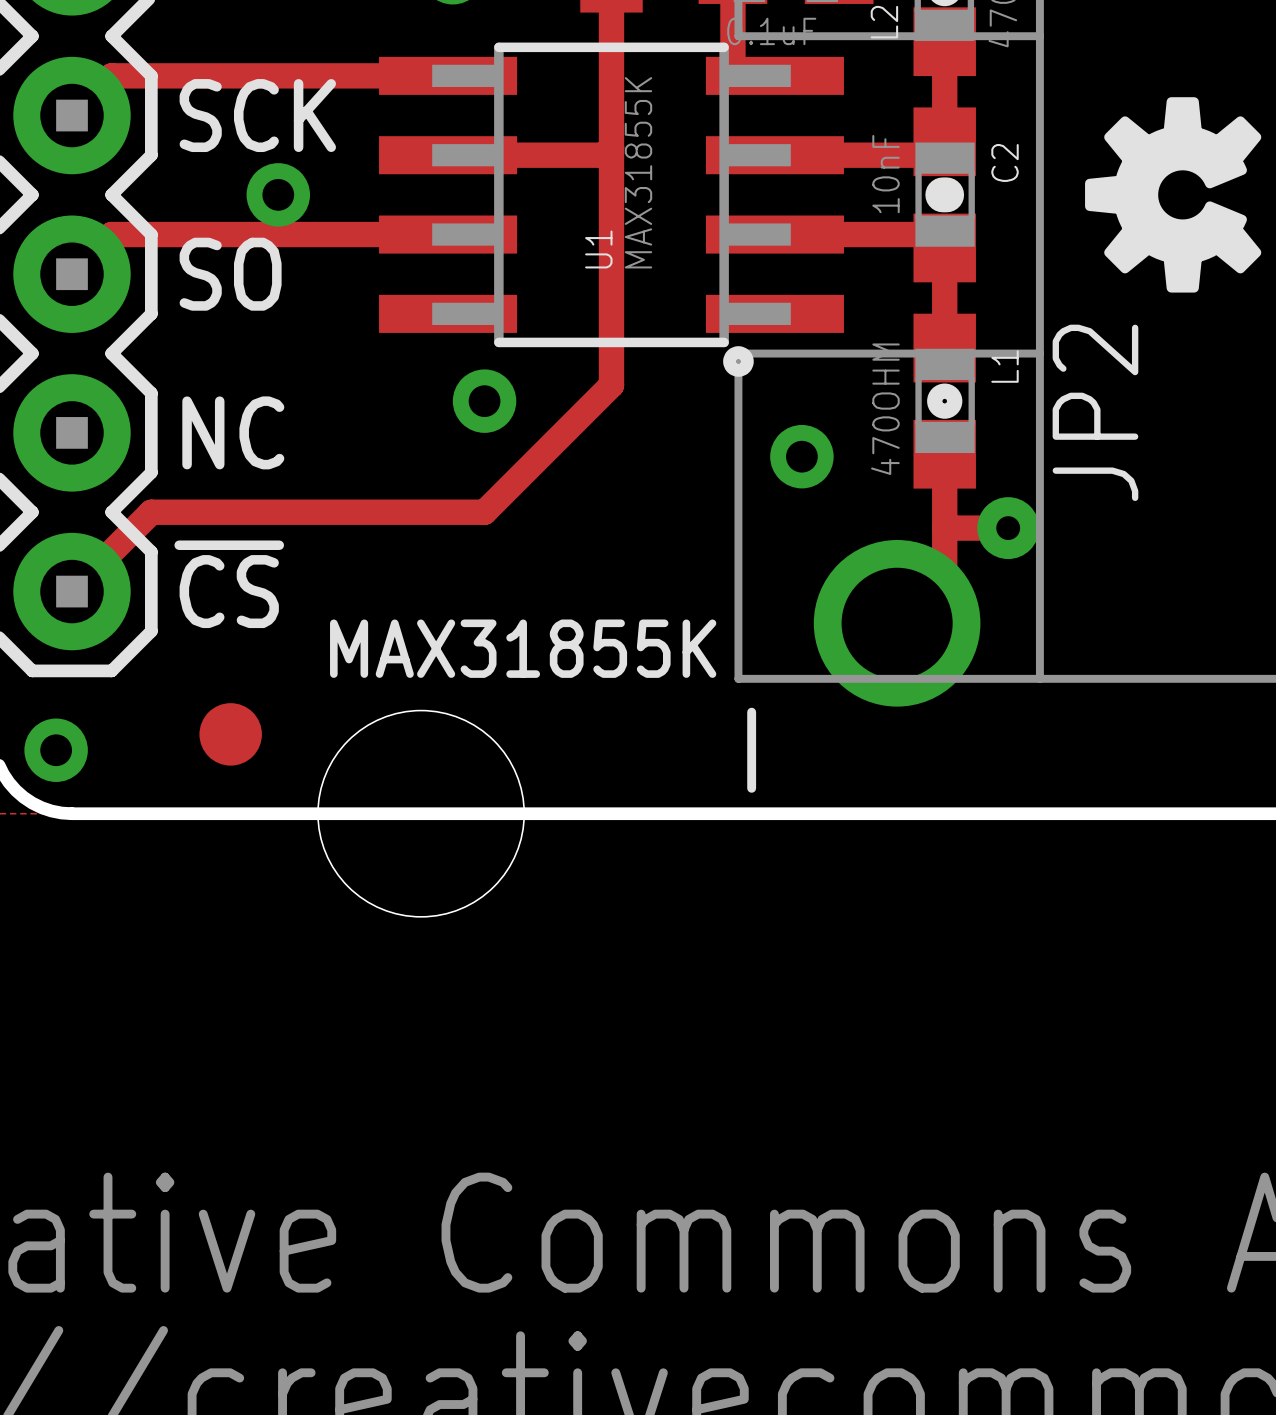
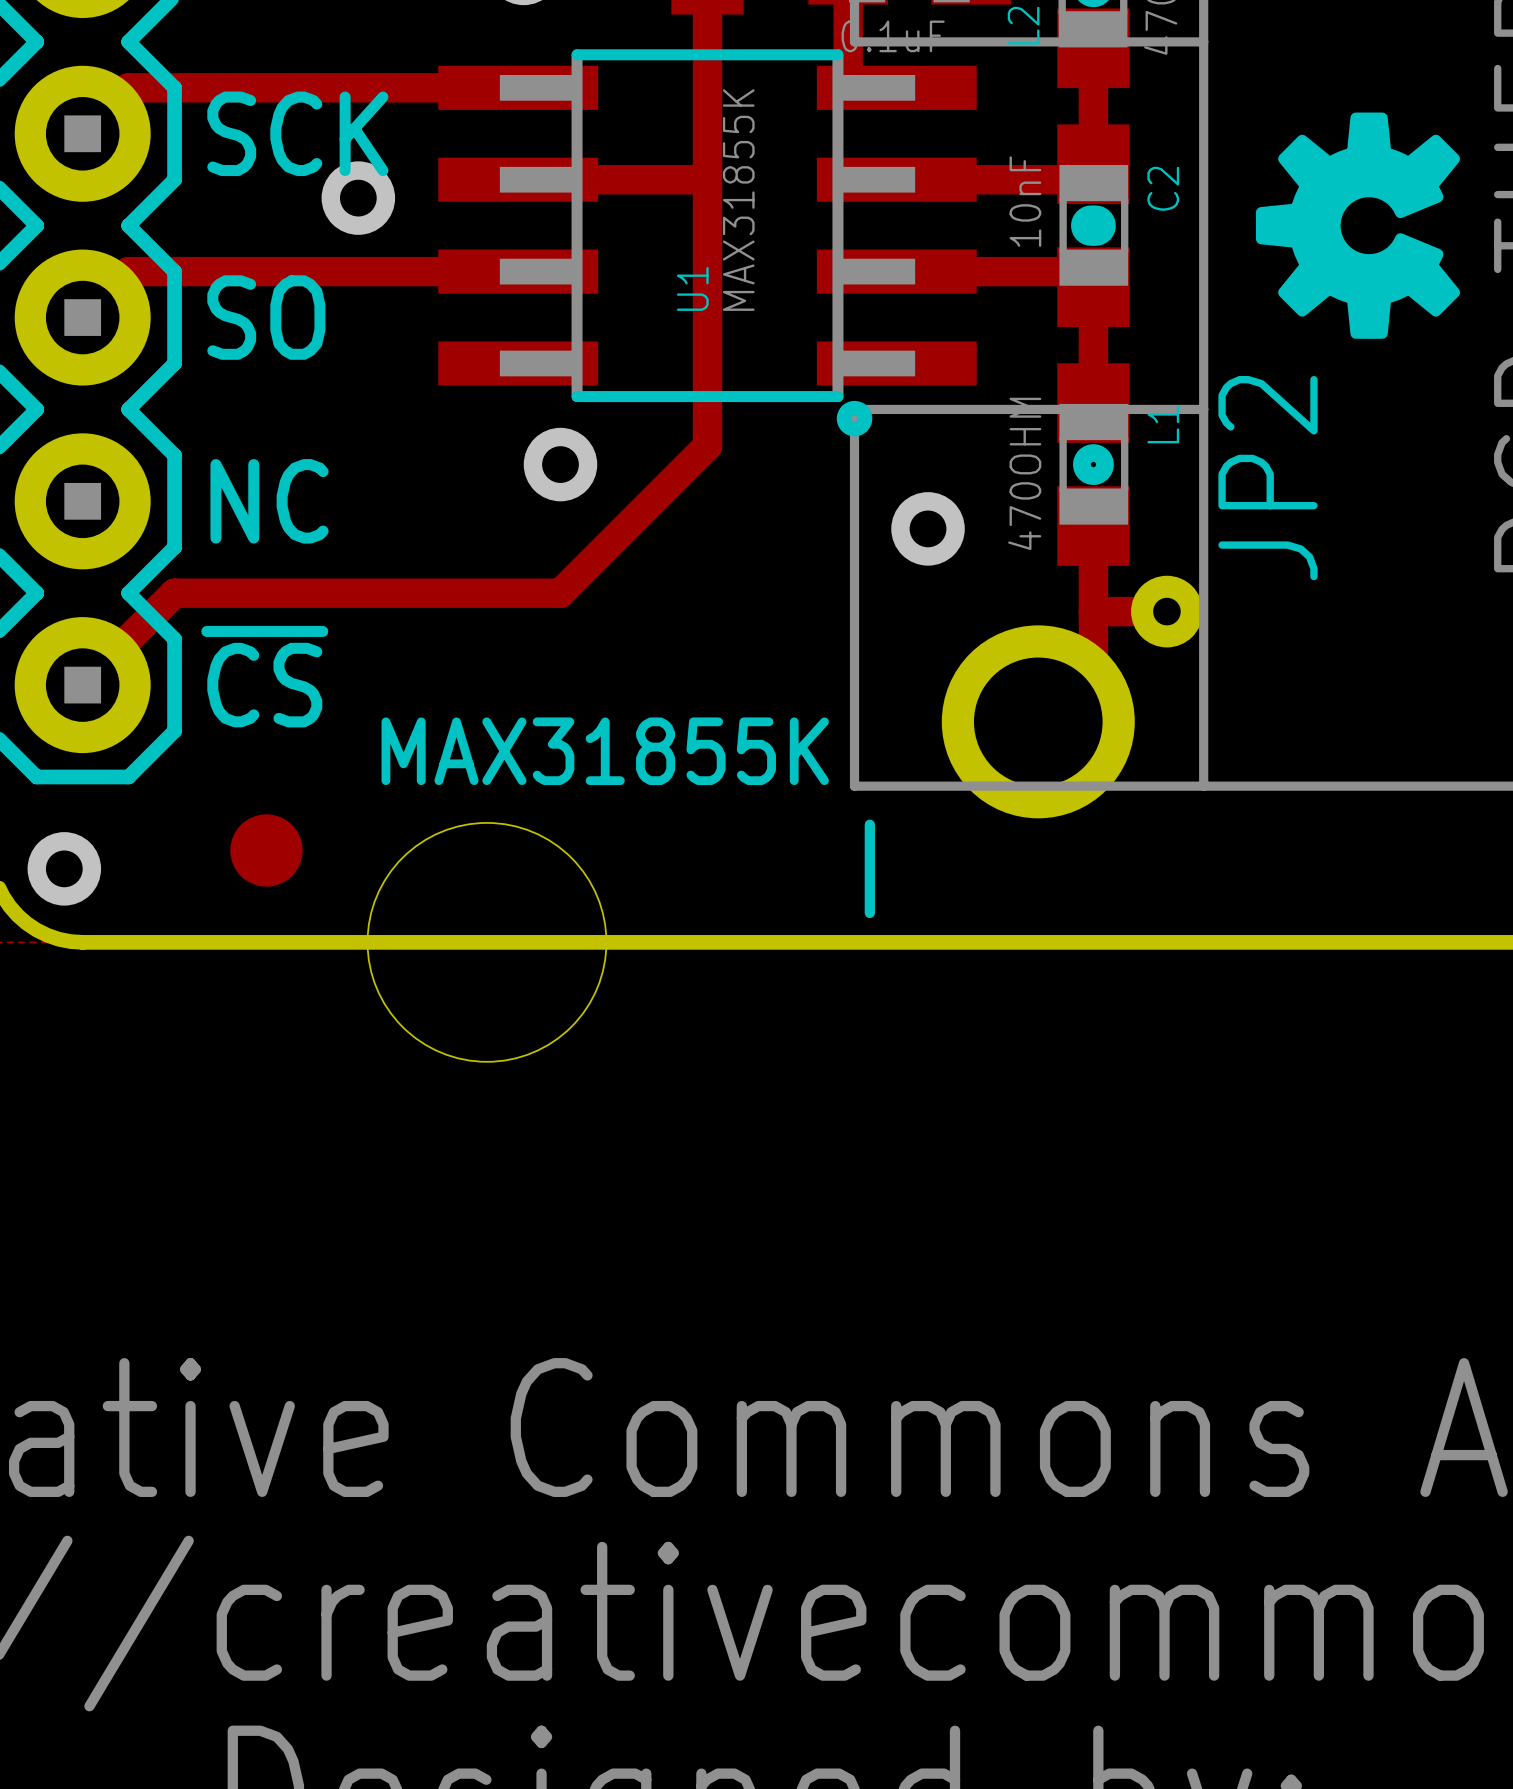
via position: (278, 194) -> (358, 198)

